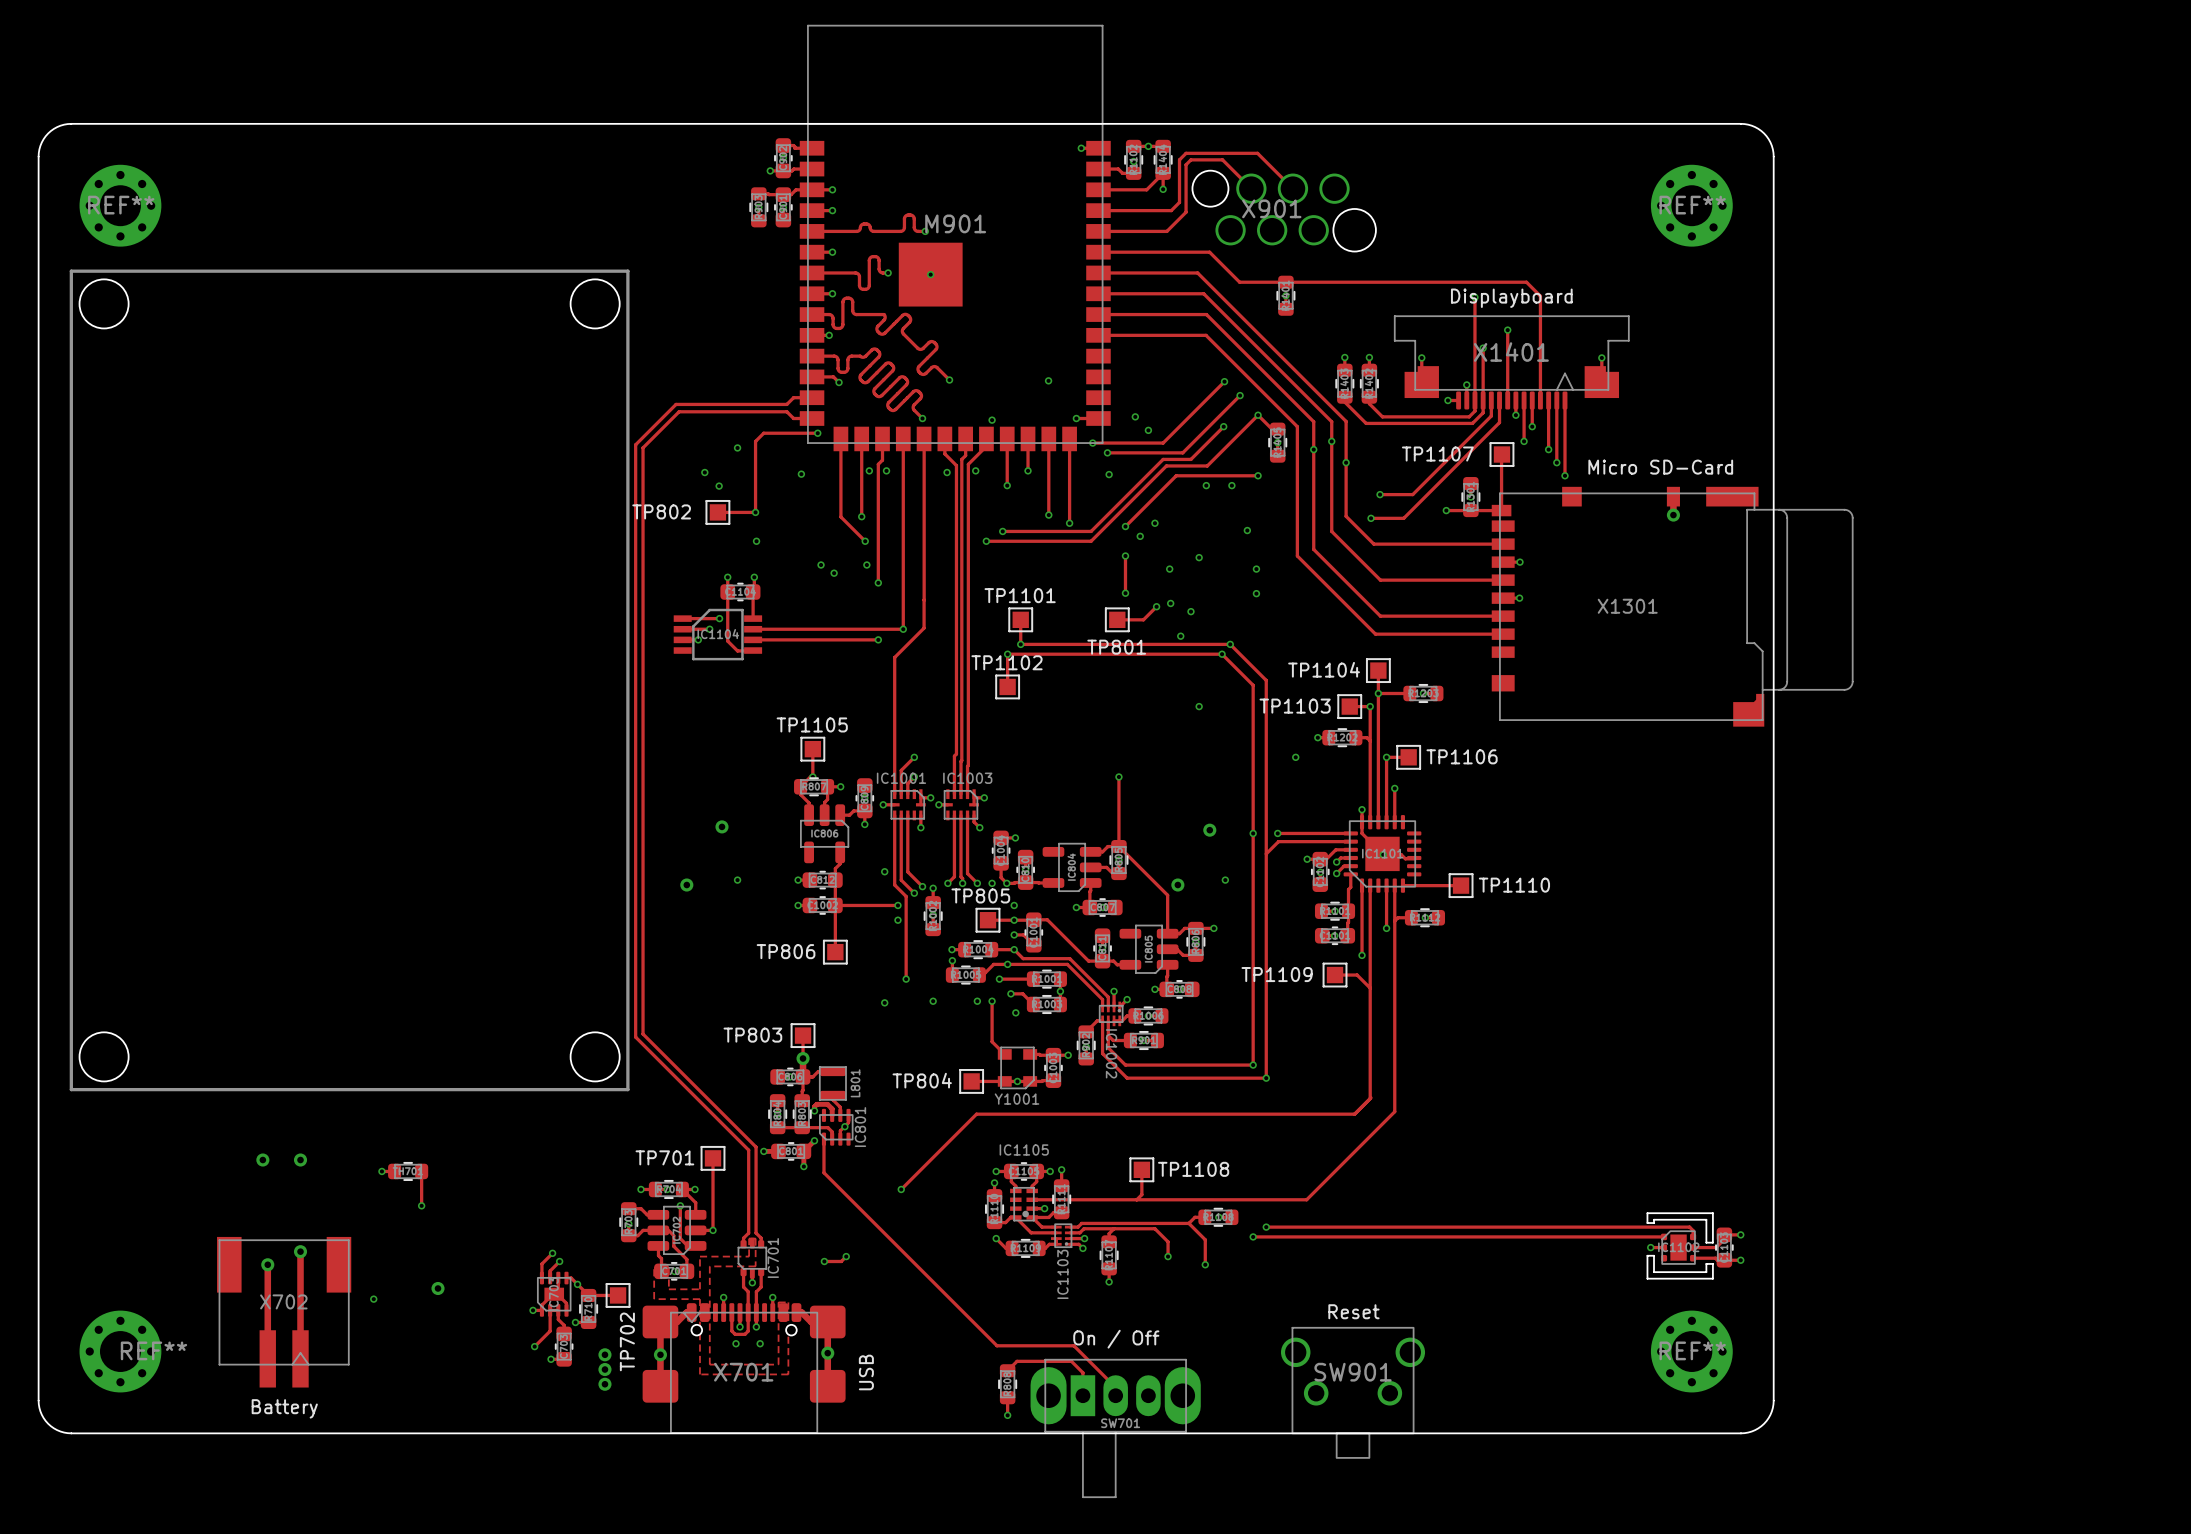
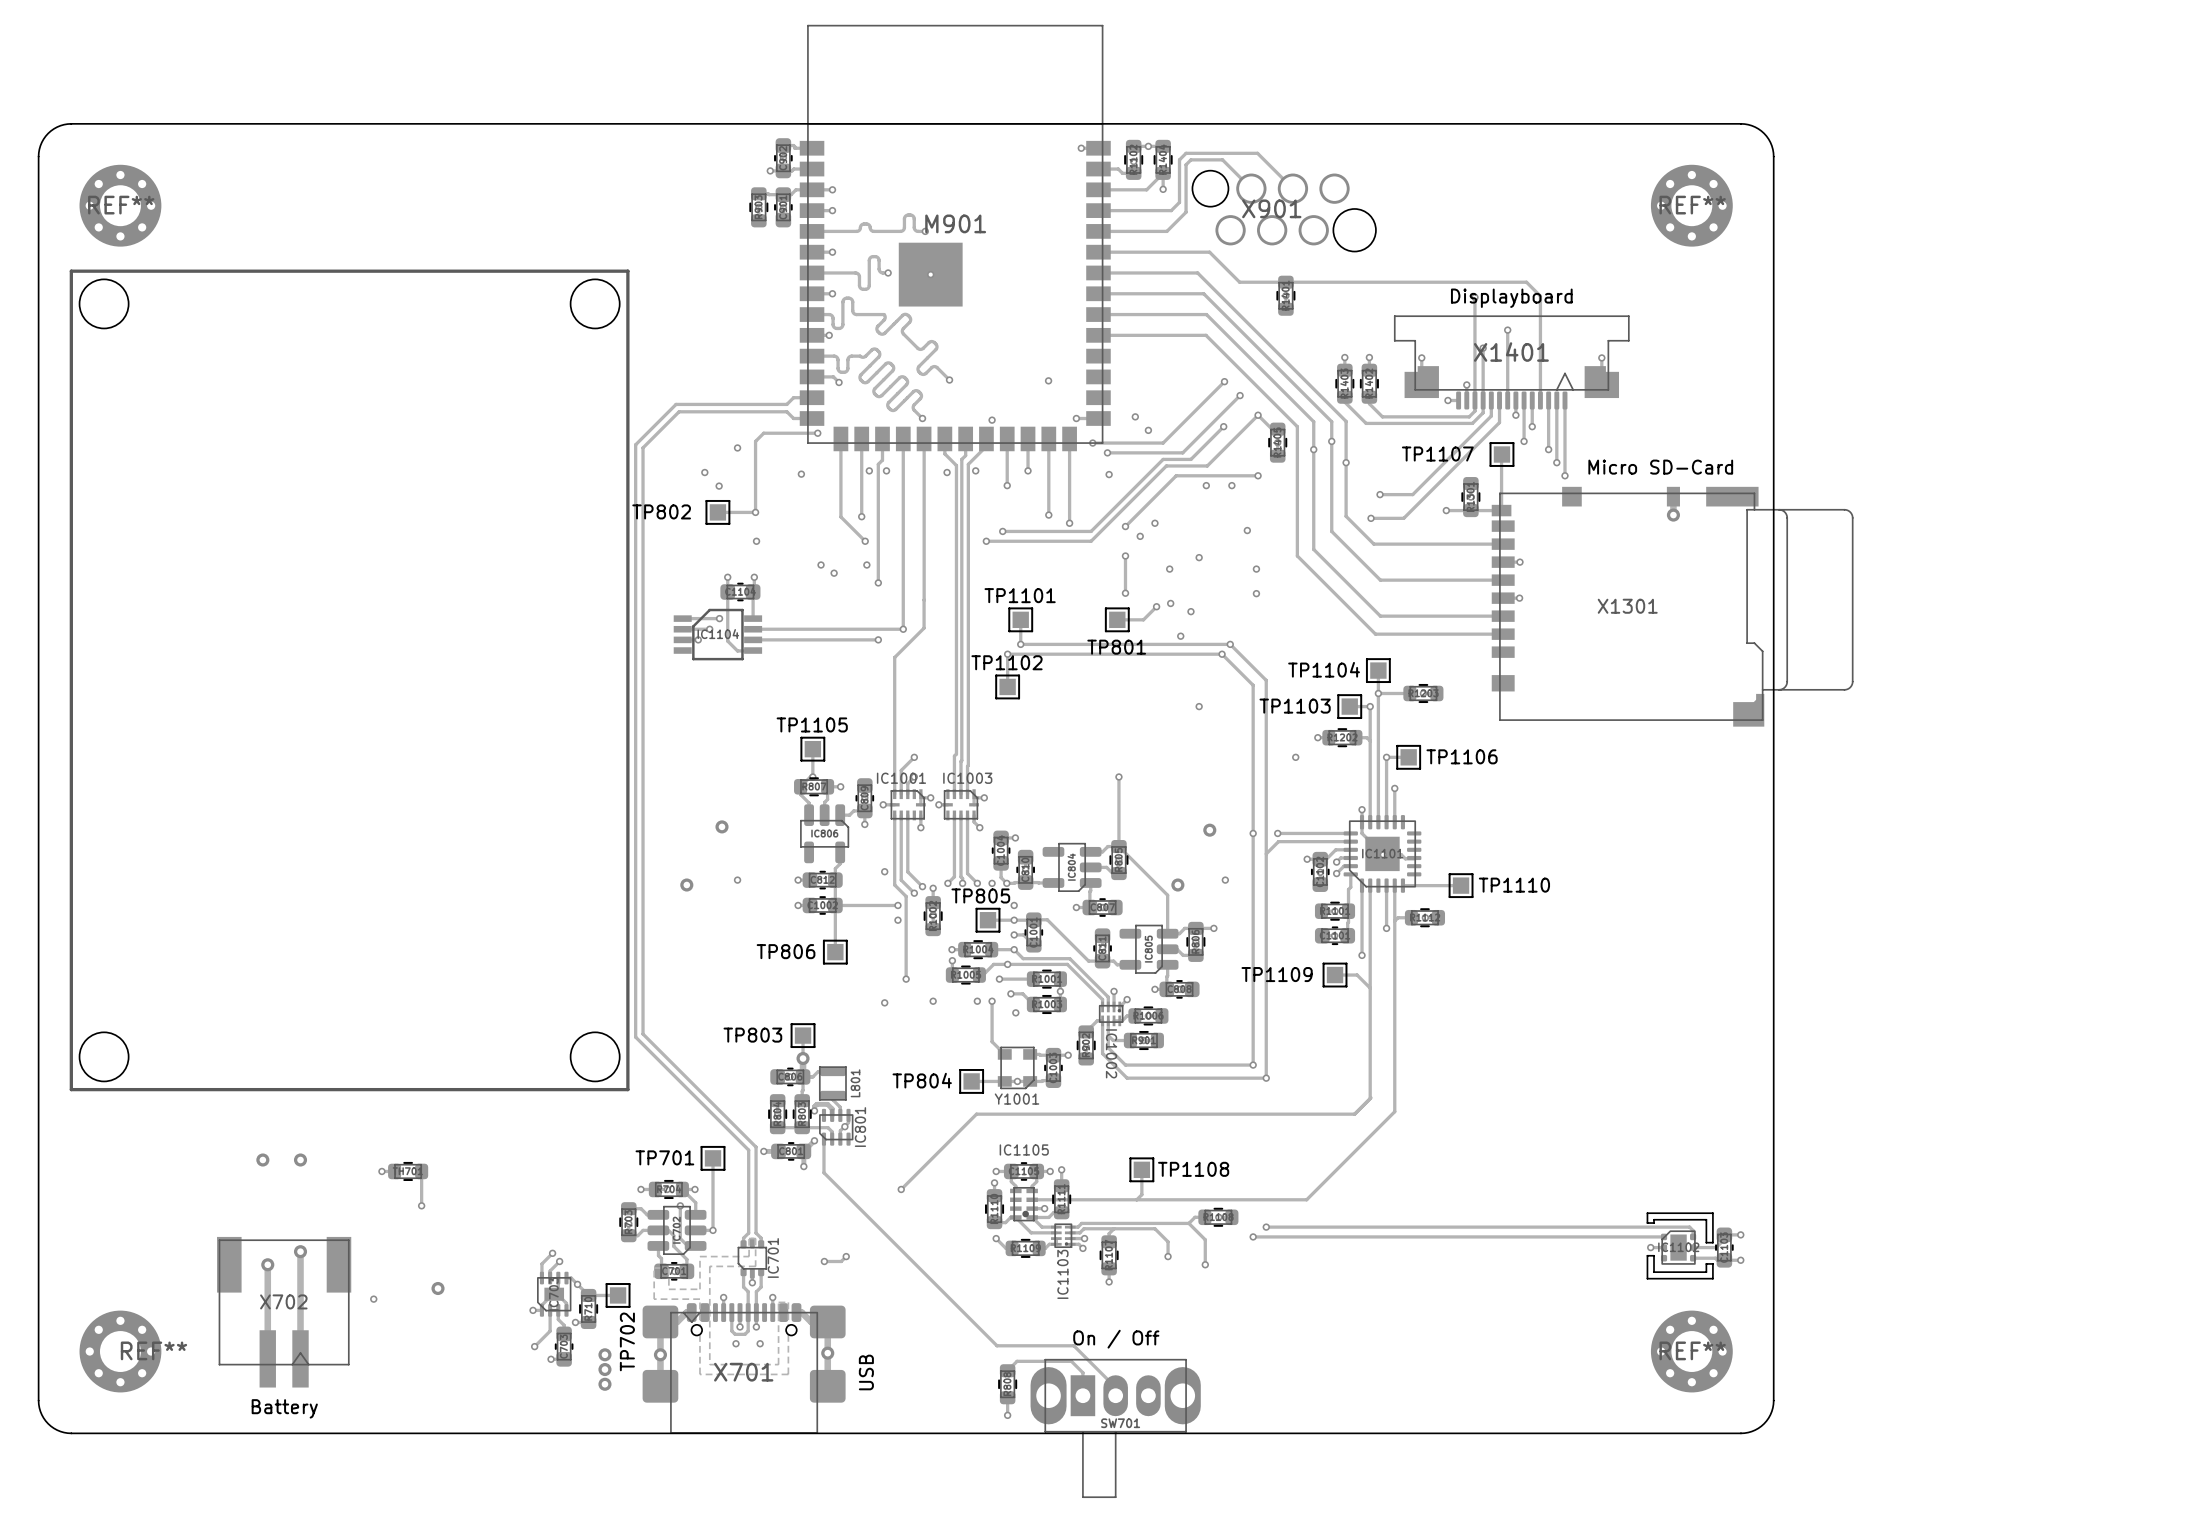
SW901: Reset (1353, 1392) -> none

